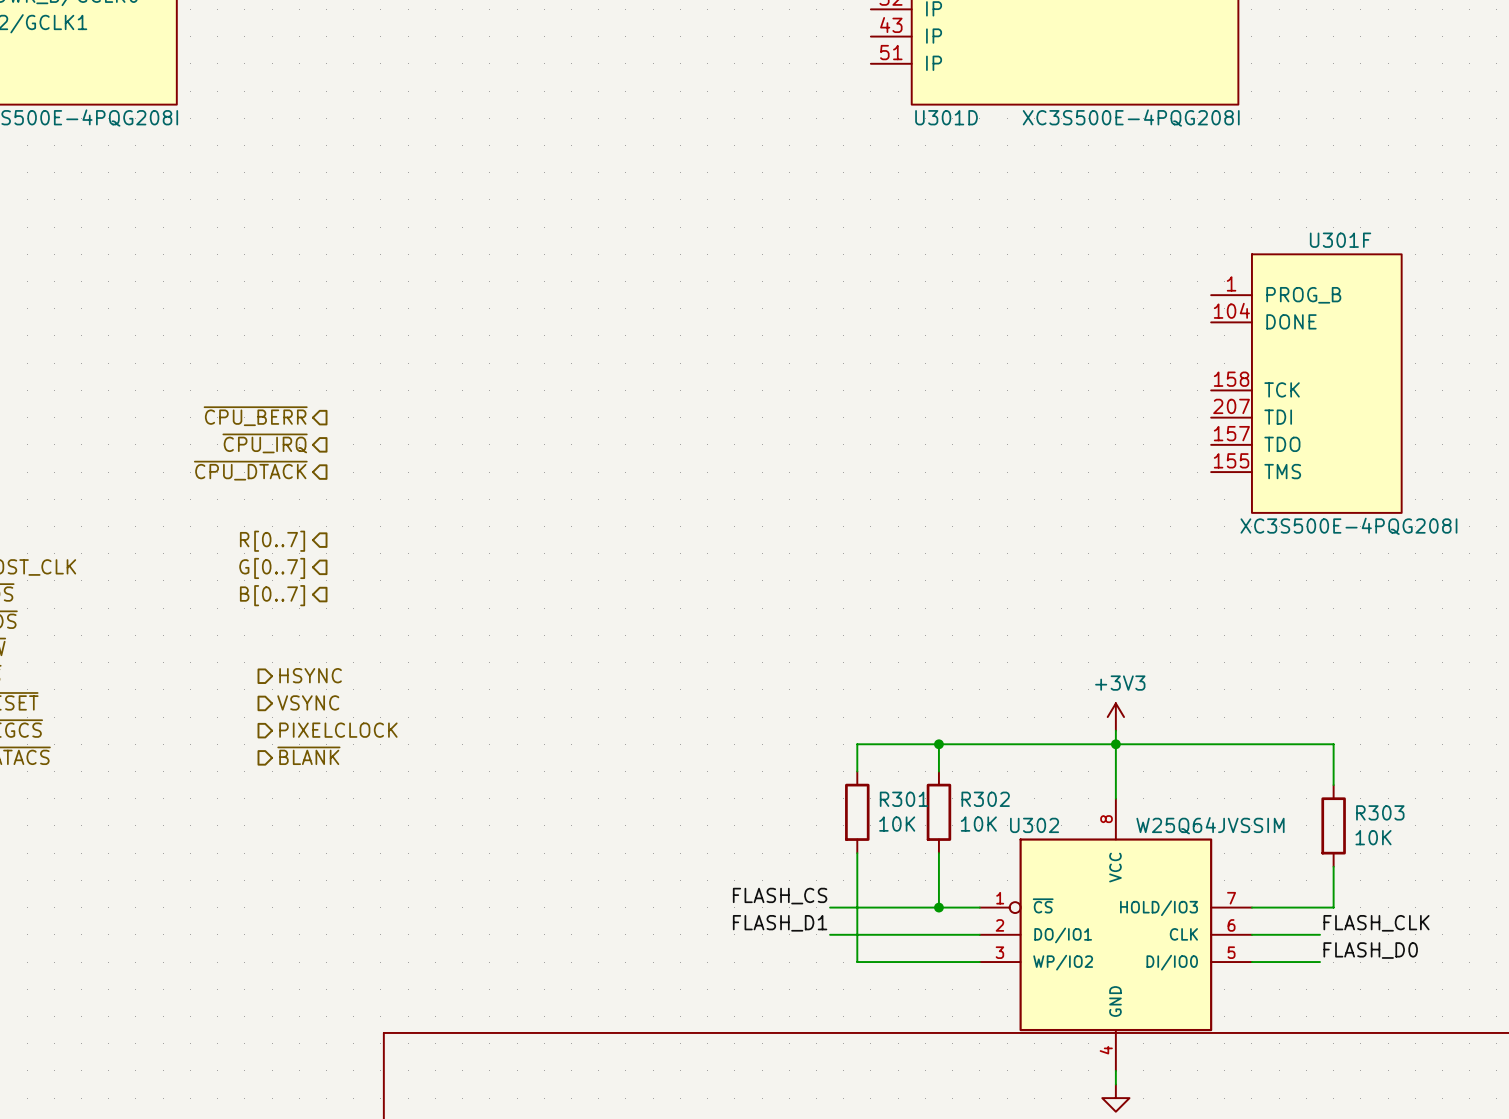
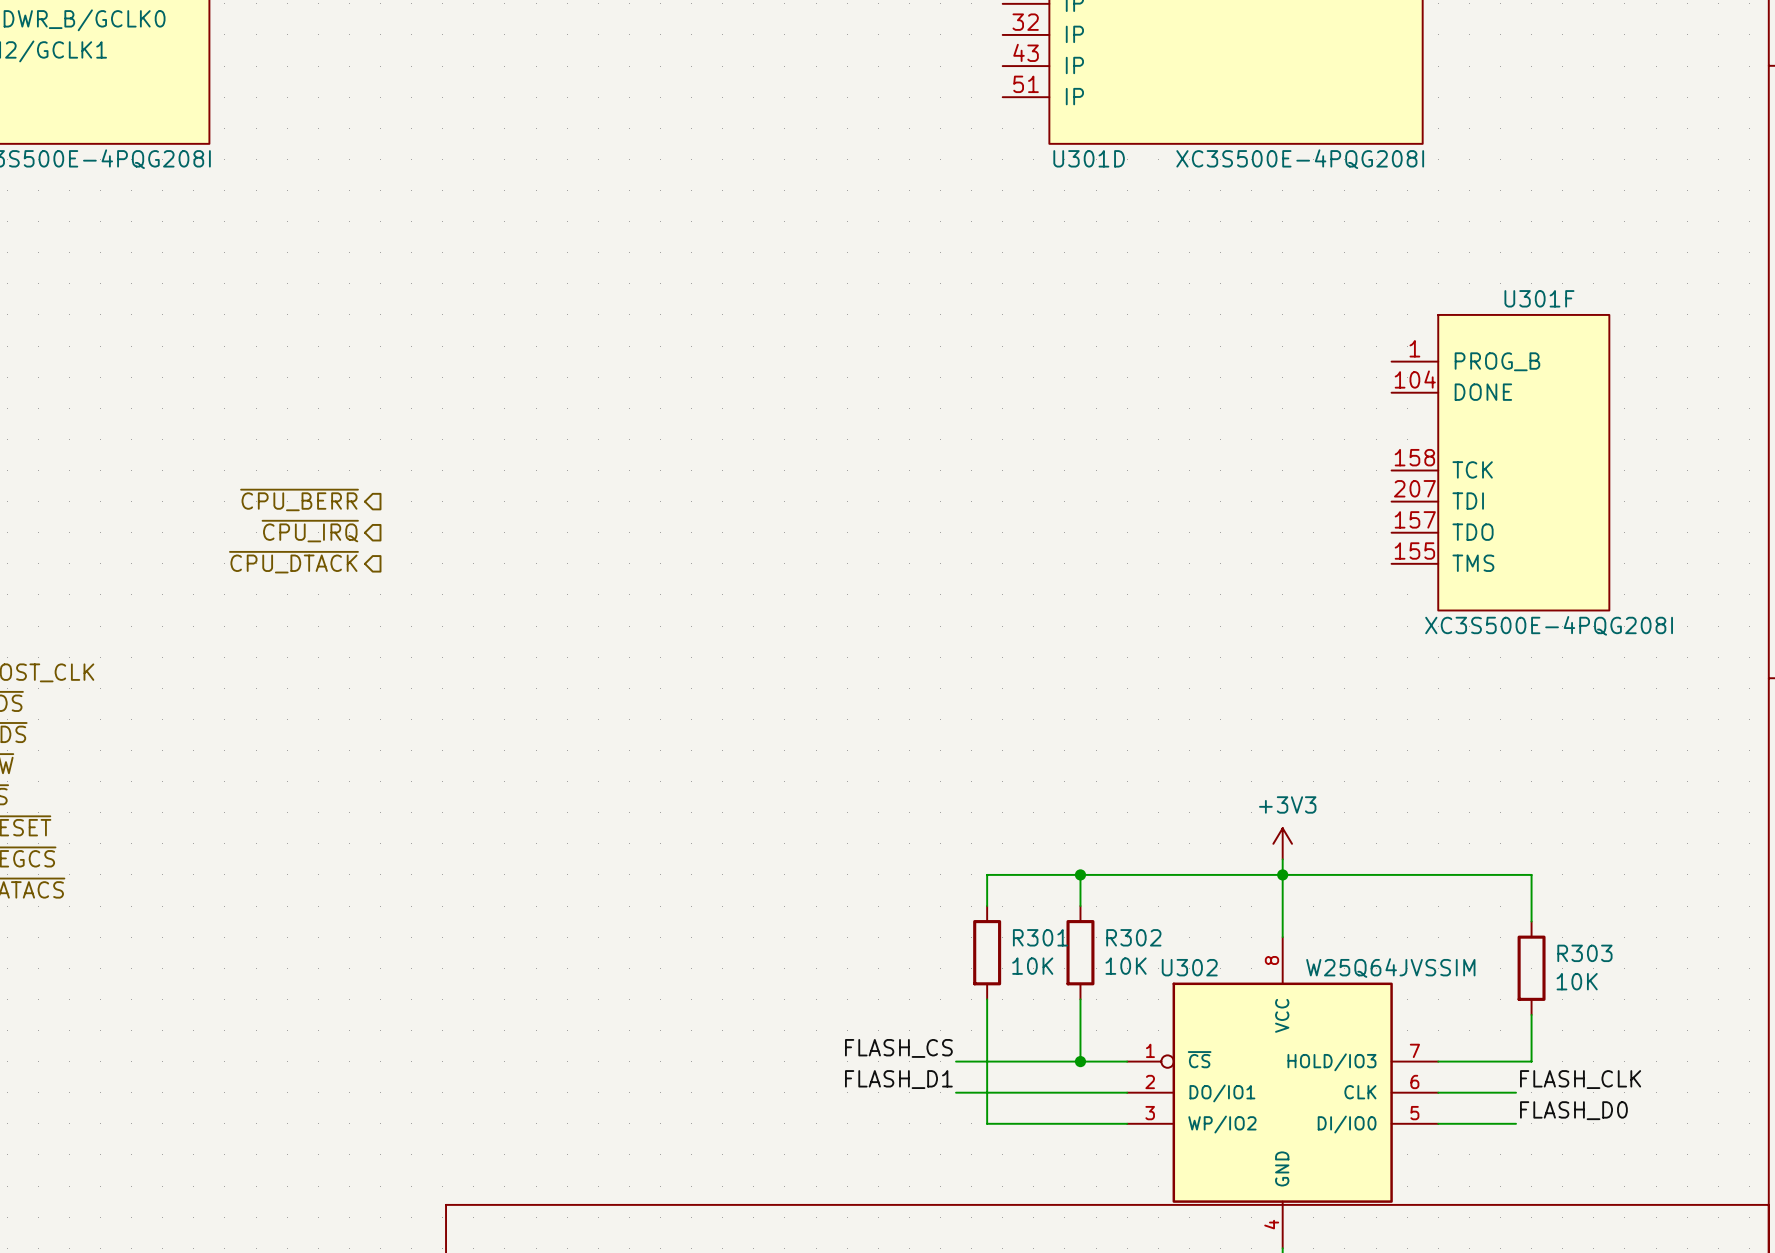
hierarchical label: R[0..7] (272, 541) -> none
hierarchical label: G[0..7] (272, 568) -> none
hierarchical label: B[0..7] (272, 595) -> none
hierarchical label: HSYNC (310, 675) -> none
hierarchical label: VSYNC (308, 702) -> none
hierarchical label: PIXELCLOCK (338, 730) -> none
hierarchical label: ~{BLANK} (308, 755) -> none

